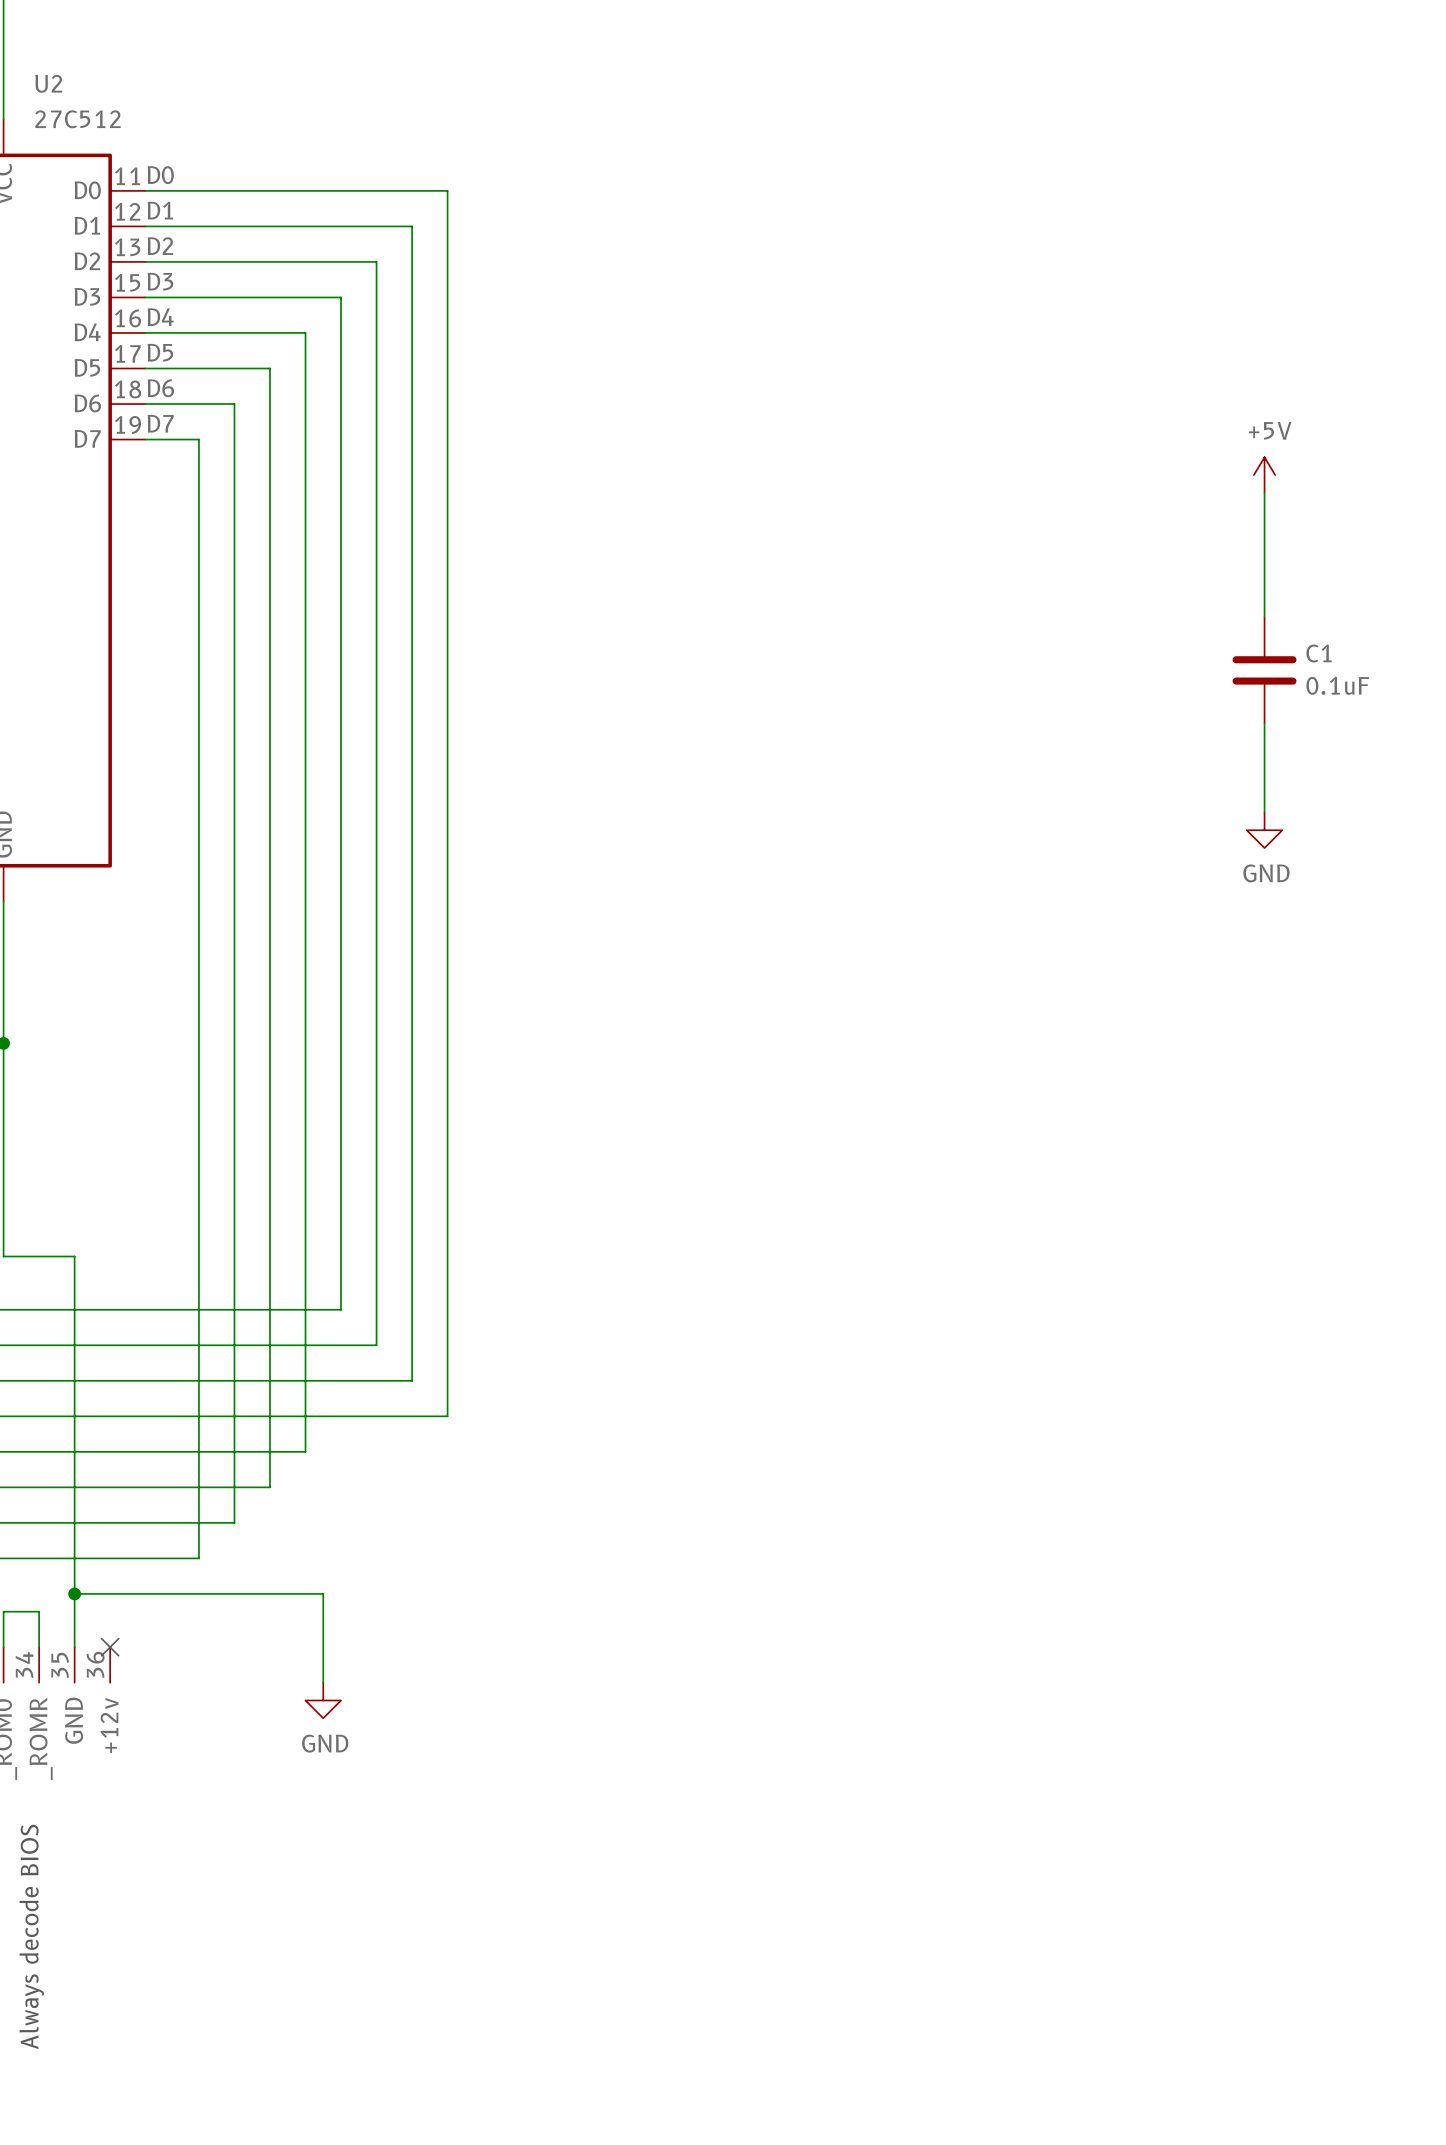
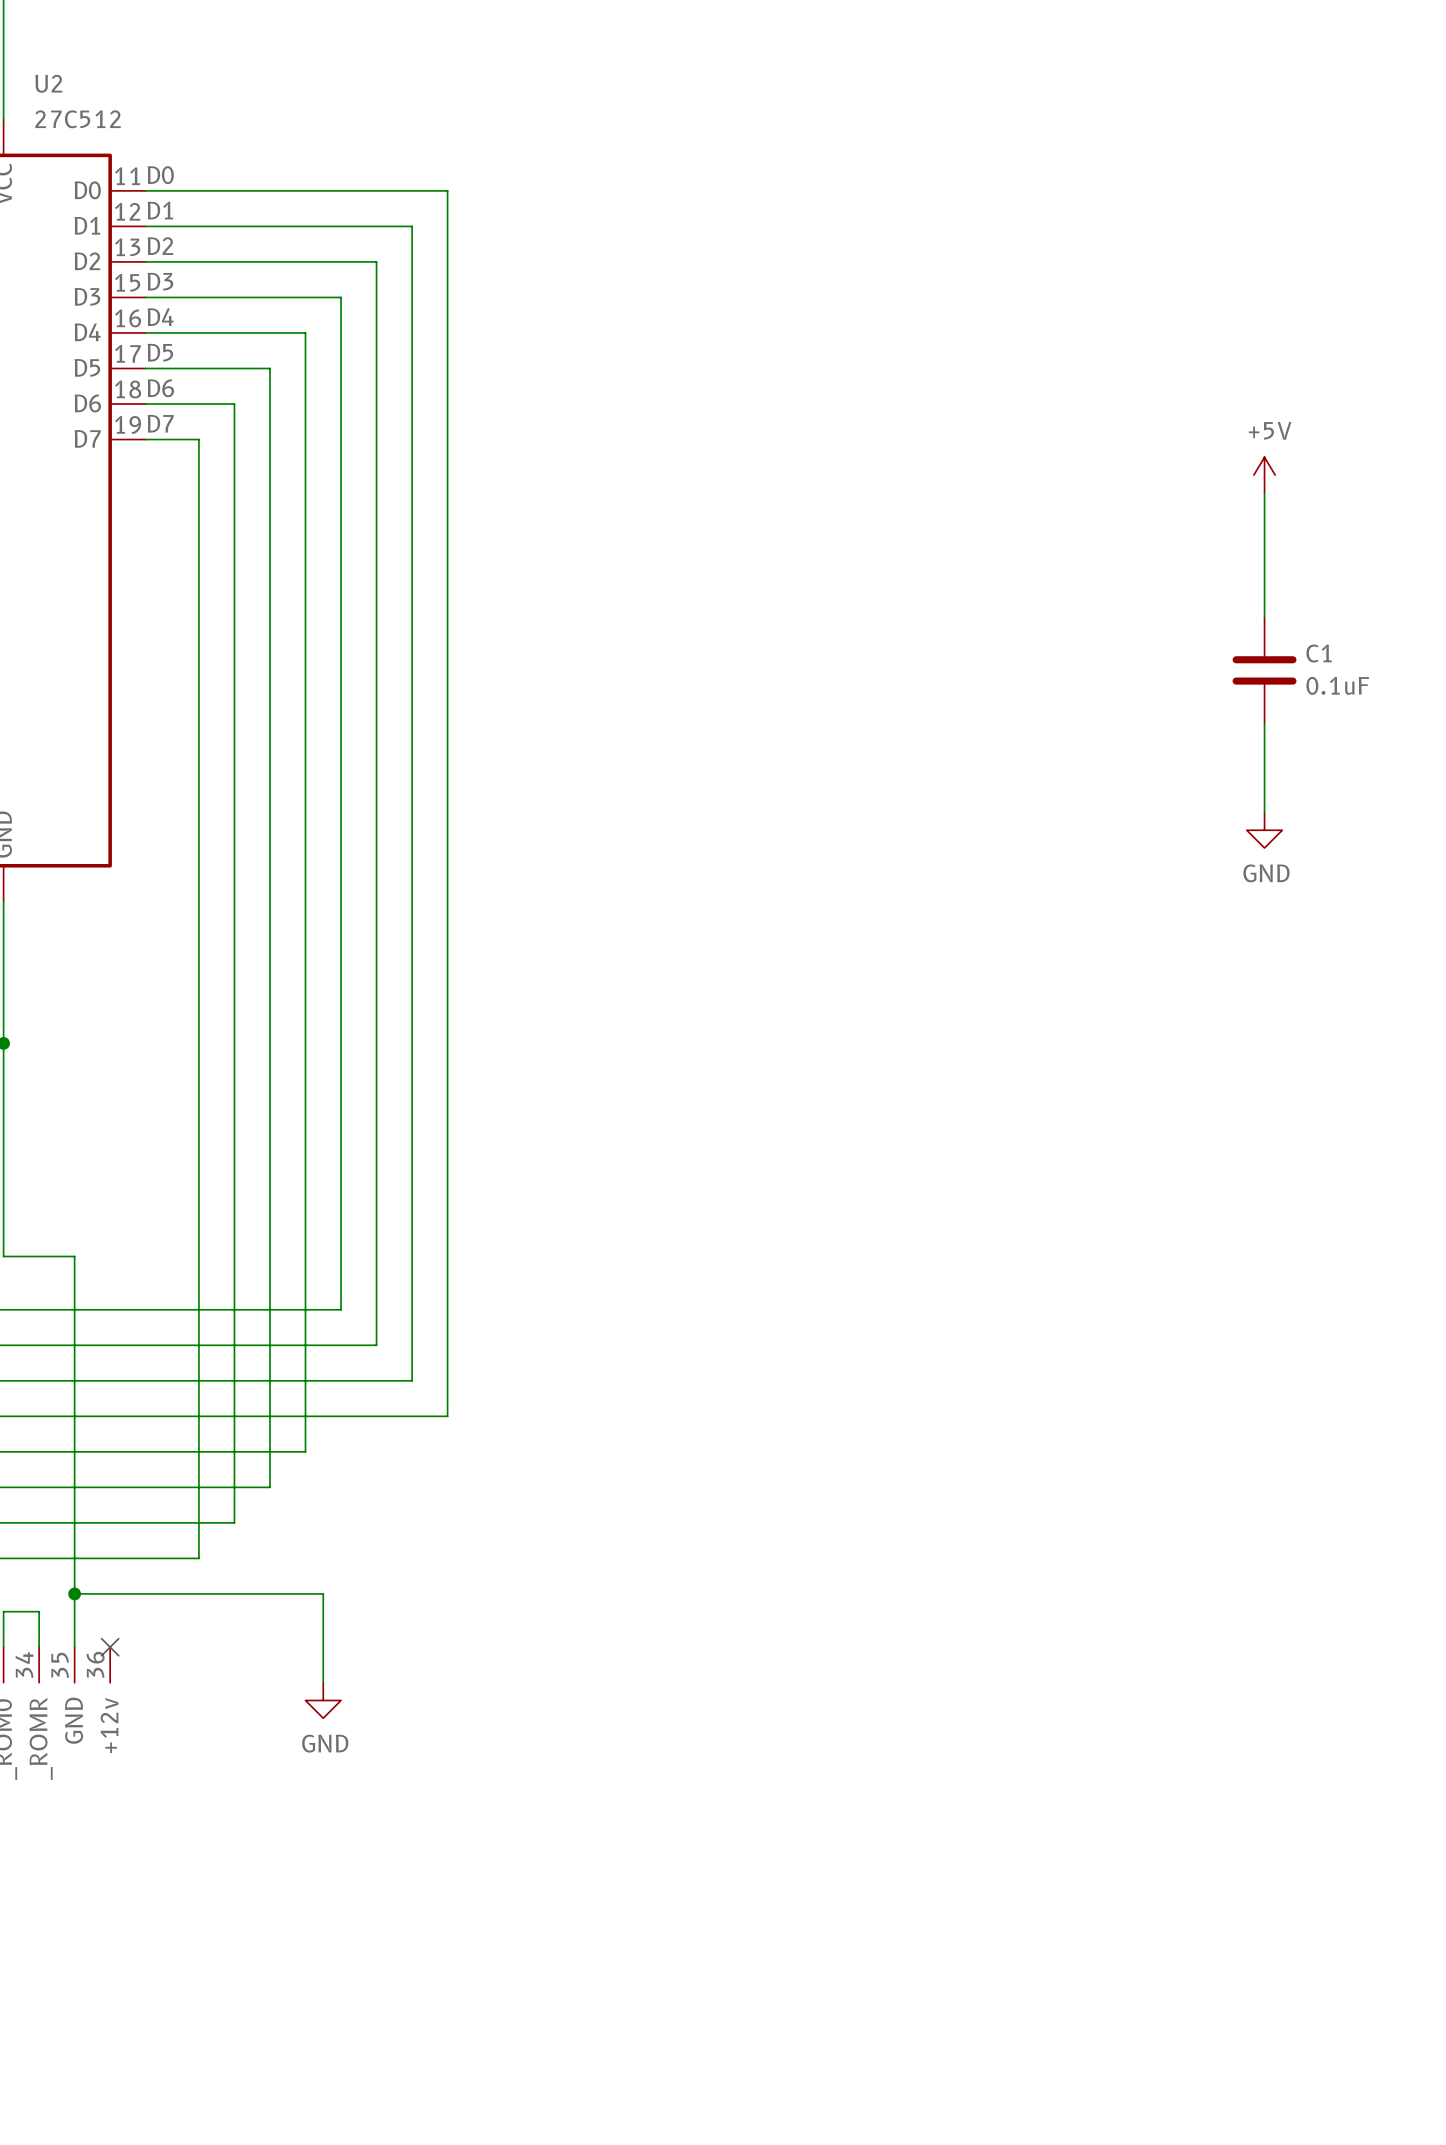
text: Always decode BIOS (31, 1936) -> none

